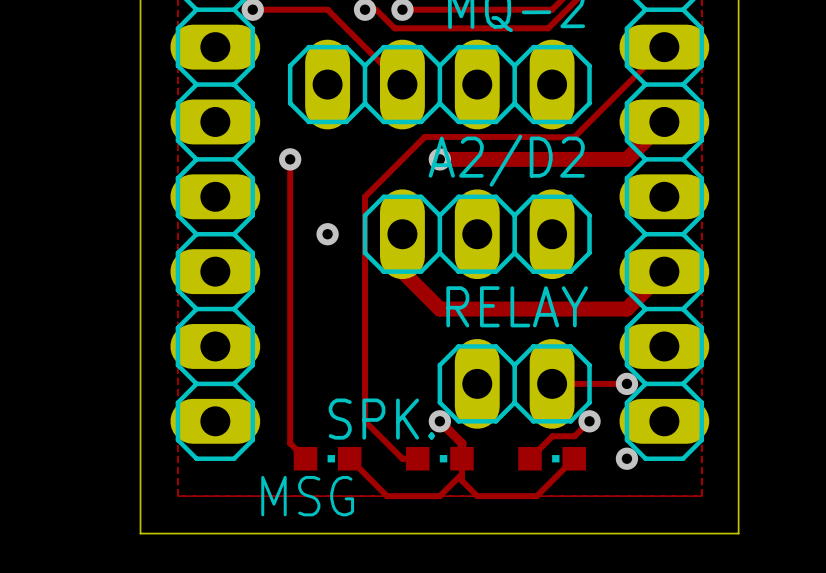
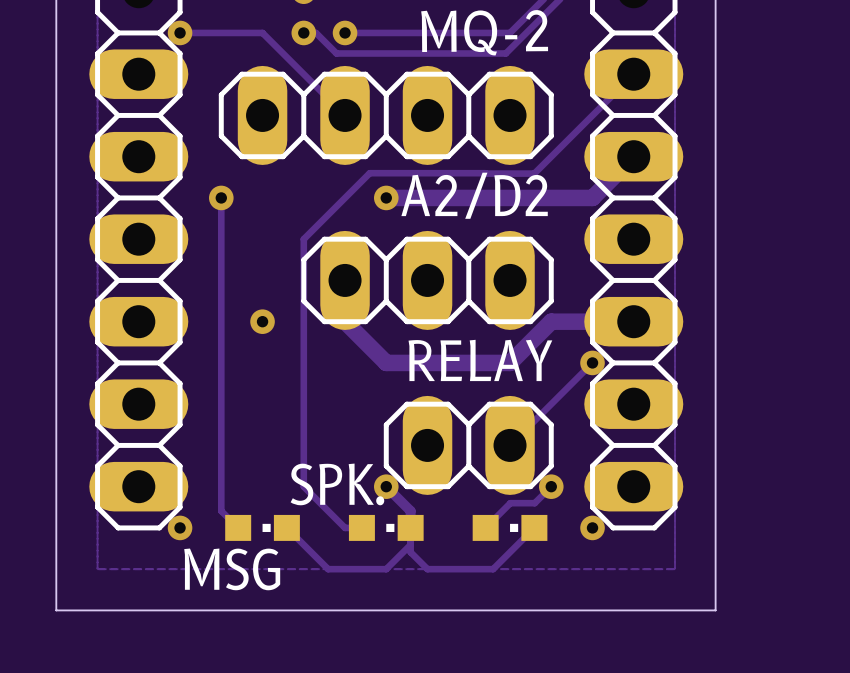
via position: (327, 234) -> (262, 321)
track: (664, 271) (626, 309) (552, 309) -> (633, 321) (551, 321) (510, 362)
track: (552, 383) (626, 383) -> (510, 445) (592, 362)
via position: (626, 383) -> (592, 362)
via: none -> (180, 527)

